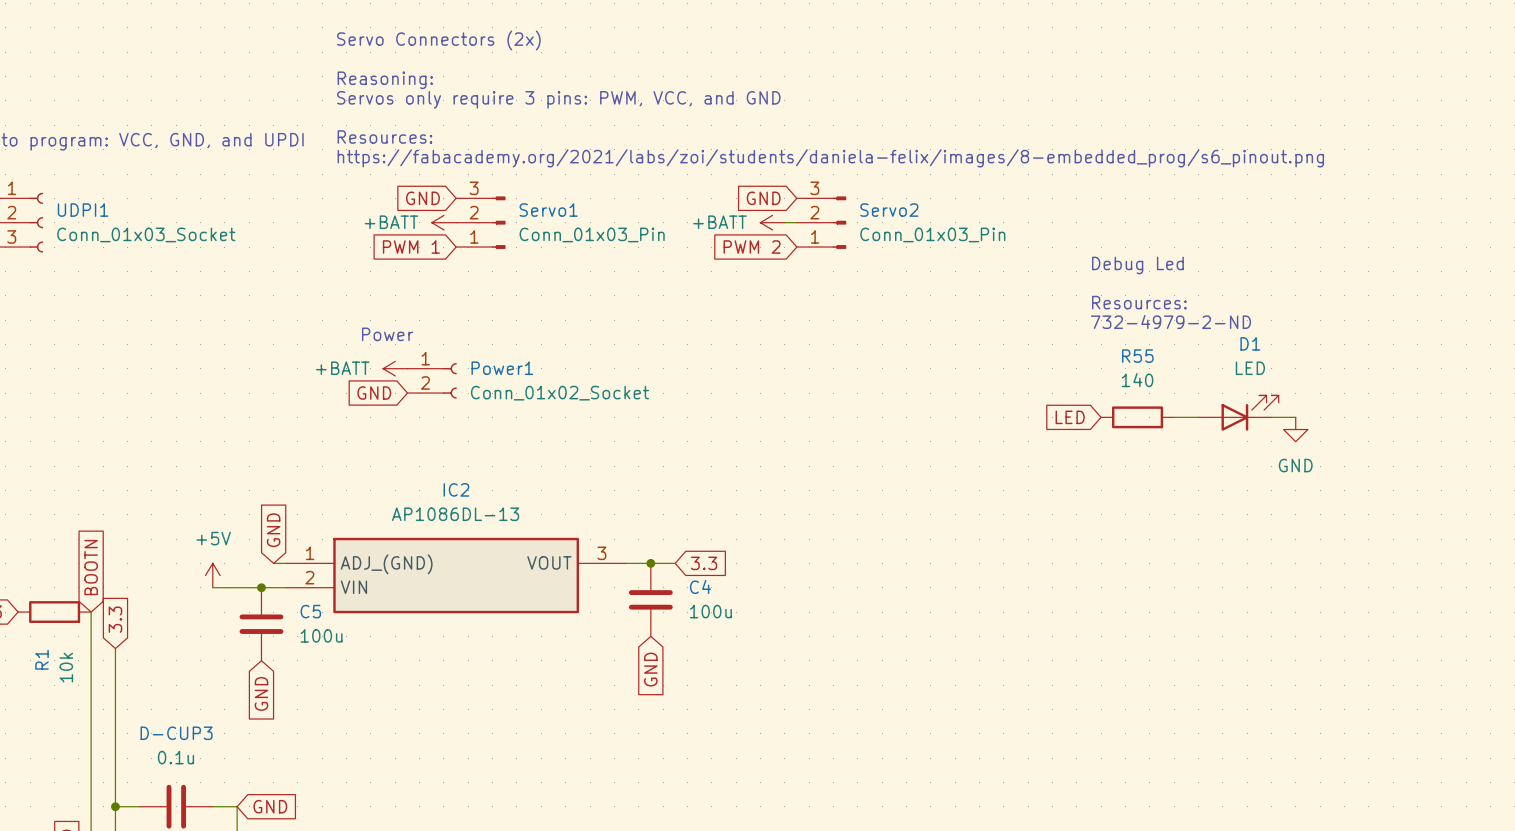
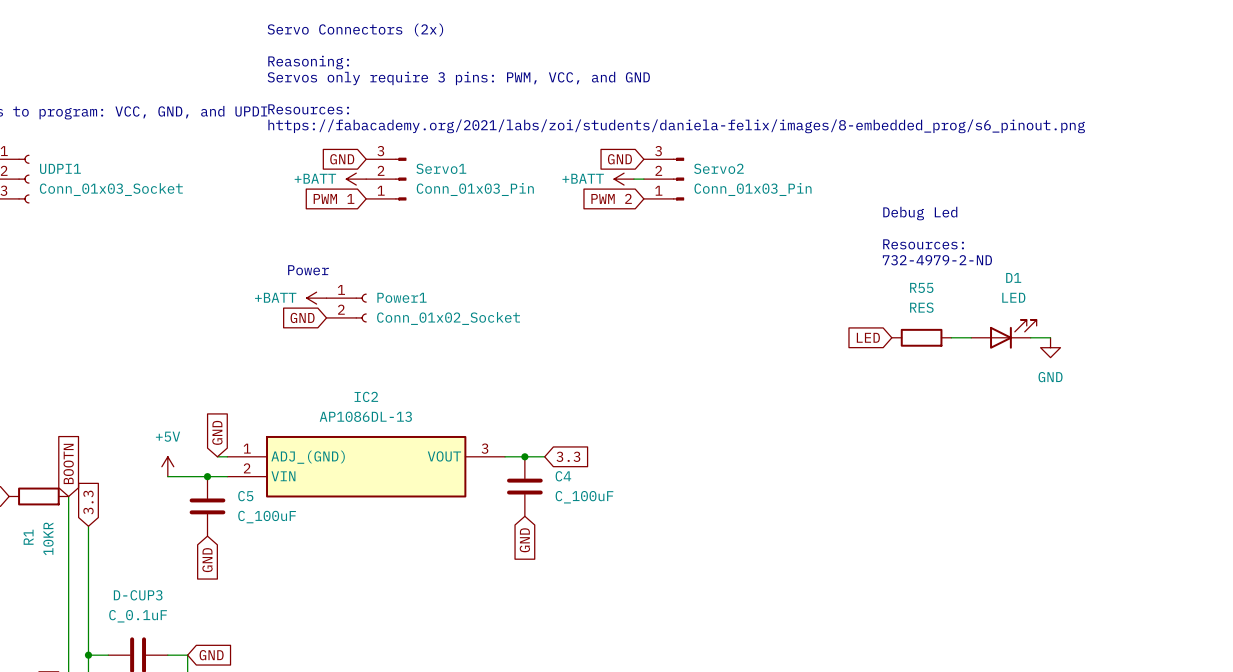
R55 value: 140 (1137, 380) -> RES (921, 307)
C4 value: 100u (710, 611) -> C_100uF (584, 497)
C5 value: 100u (321, 635) -> C_100uF (267, 517)
R1 value: 10k (66, 667) -> 10KR (48, 538)
D-CUP3 value: 0.1u (176, 757) -> C_0.1uF (138, 616)

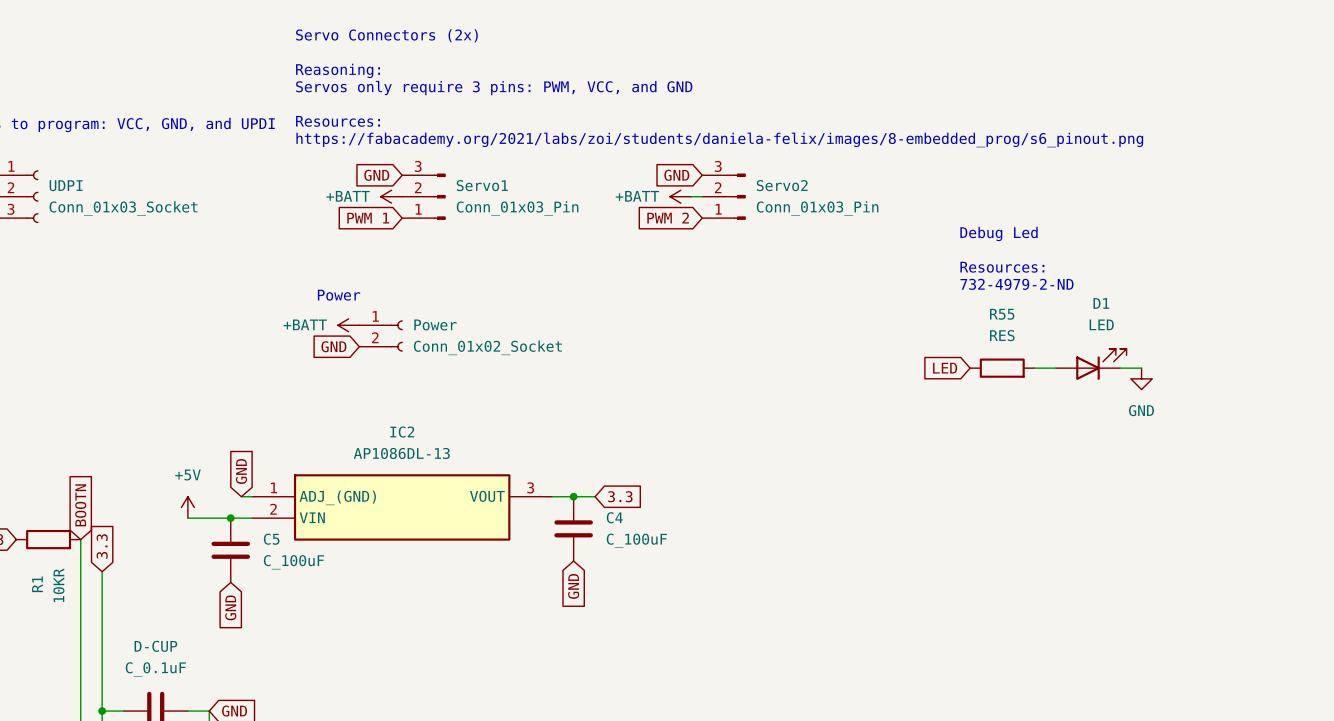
UDPI1 name: UDPI1 (60, 168) -> UDPI (66, 185)
Power1 name: Power1 (401, 297) -> Power (435, 324)
D-CUP3 name: D-CUP3 (138, 595) -> D-CUP (155, 646)

